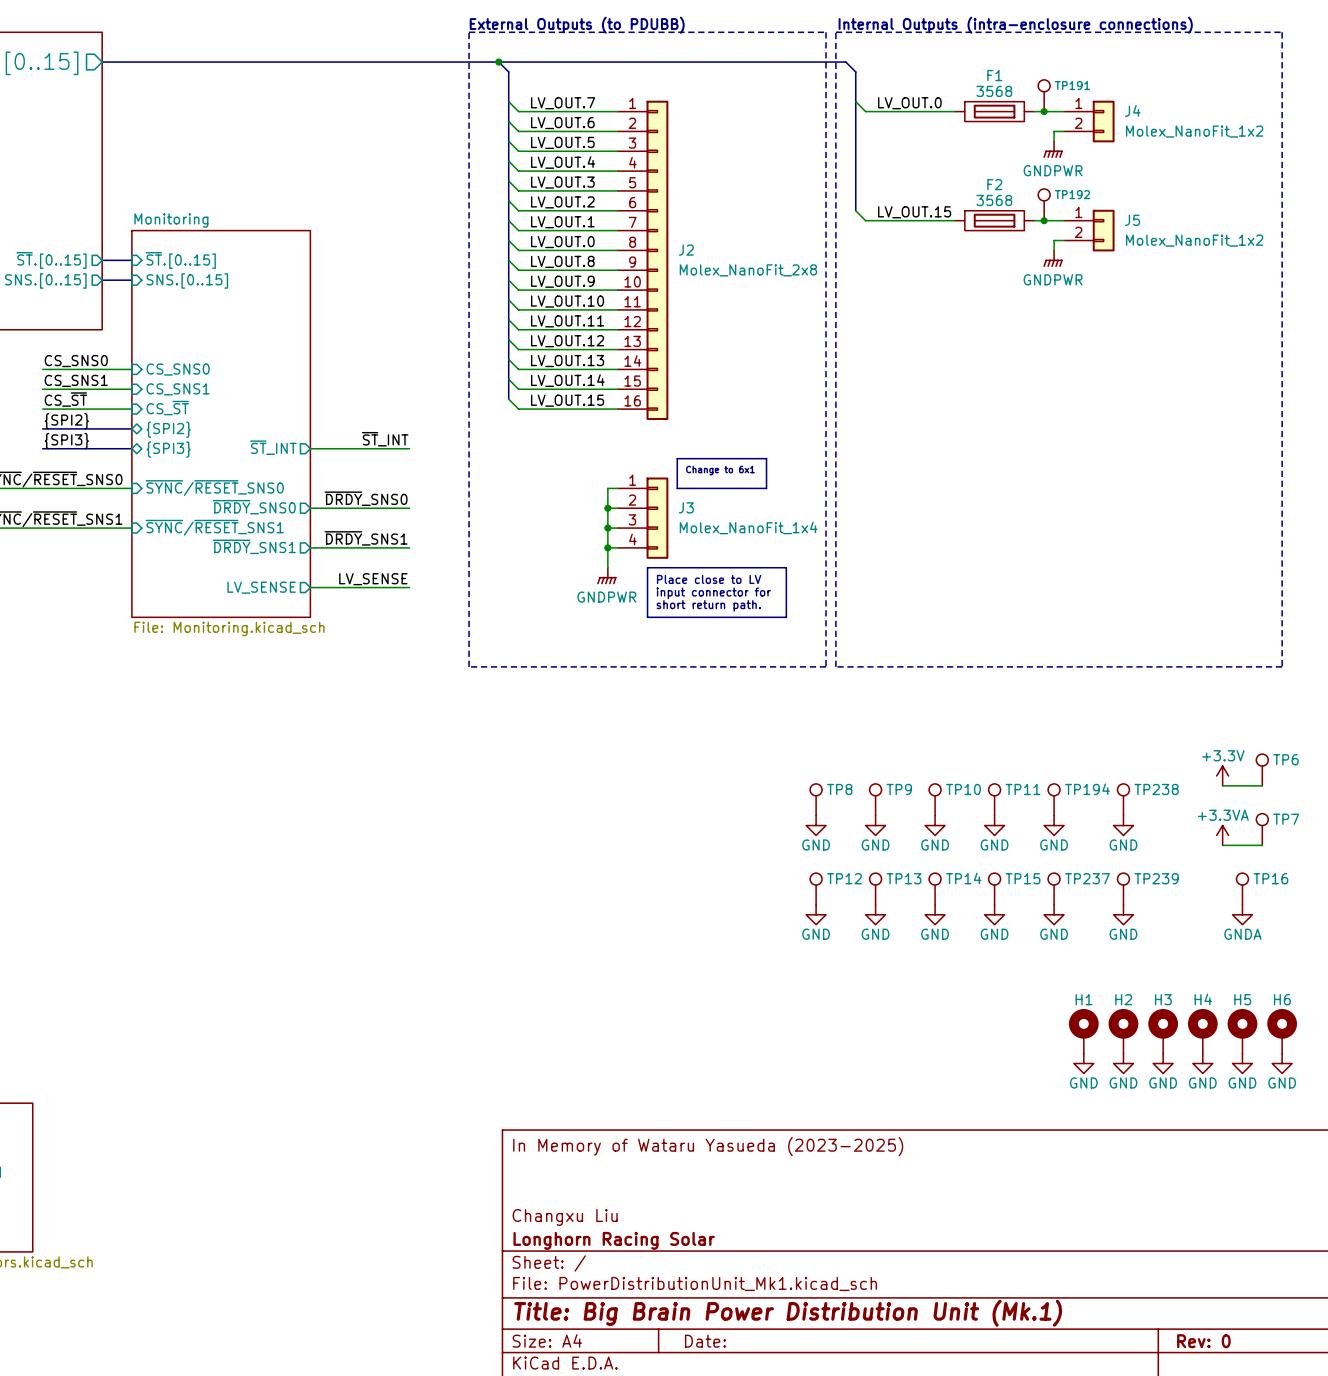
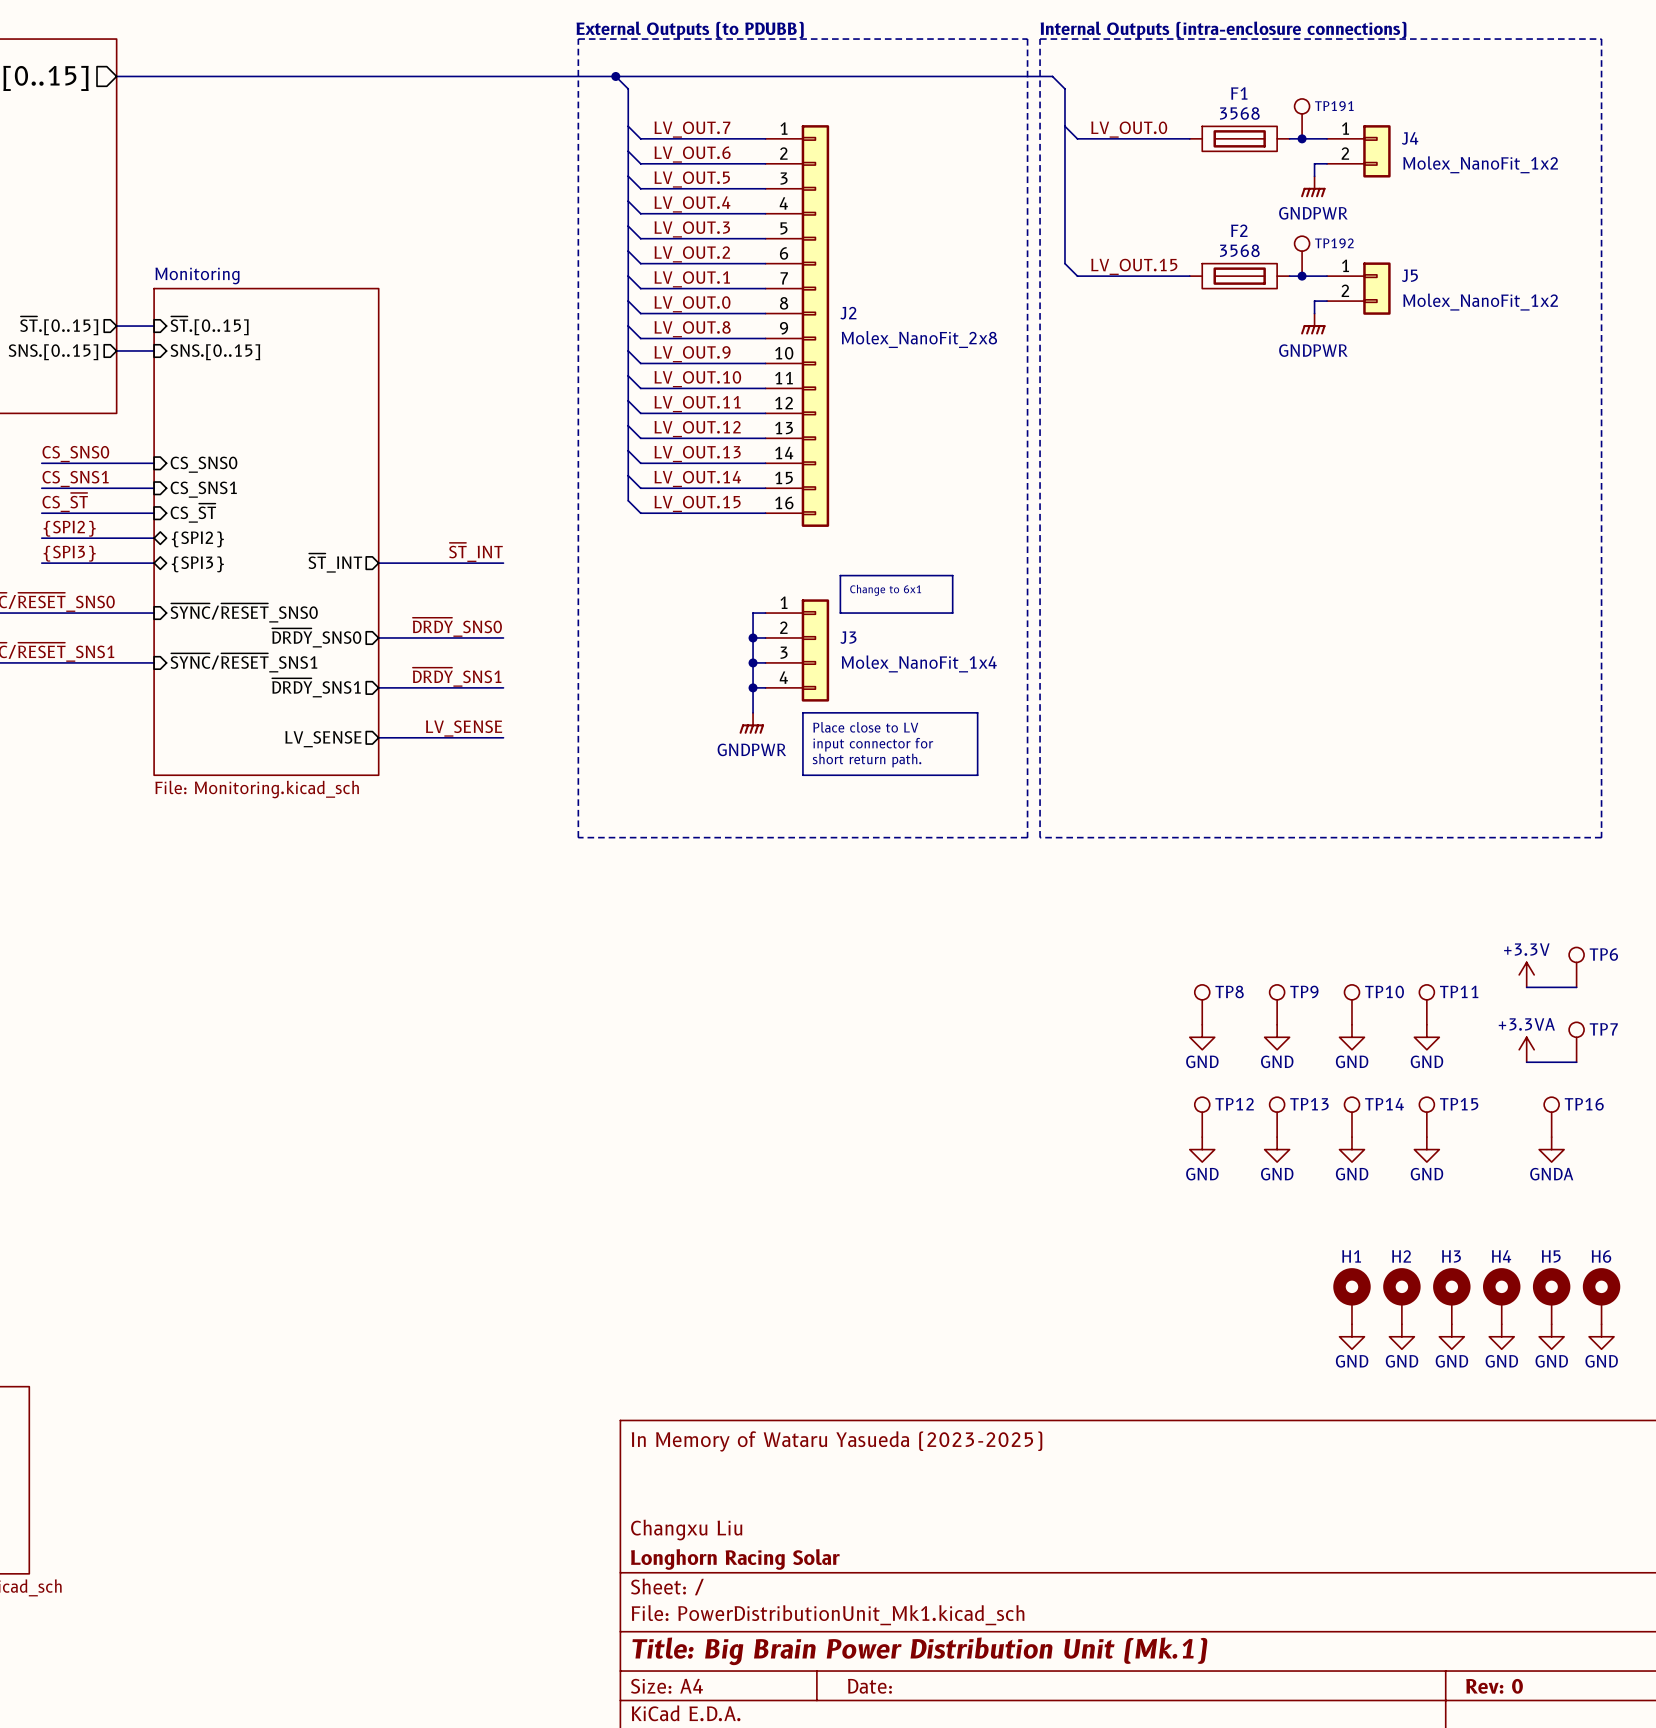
TP8 position: (816, 799) -> (1202, 1004)
TP9 position: (875, 799) -> (1277, 1004)
TP10 position: (935, 799) -> (1351, 1004)
TP11 position: (994, 799) -> (1426, 1004)
TP194: (1054, 799) -> none
TP238: (1123, 799) -> none
power symbol: GND (816, 825) -> none
power symbol: GND (875, 825) -> none
power symbol: GND (935, 825) -> none
power symbol: none -> GND (1202, 1037)
power symbol: GND (994, 825) -> none
power symbol: none -> GND (1277, 1037)
power symbol: GND (1054, 825) -> none
power symbol: none -> GND (1351, 1037)
power symbol: GND (1123, 825) -> none
power symbol: none -> GND (1426, 1037)
TP12 position: (816, 889) -> (1202, 1117)
TP13 position: (875, 889) -> (1277, 1117)
TP14 position: (935, 889) -> (1351, 1117)
TP15 position: (994, 889) -> (1426, 1117)
TP237: (1054, 889) -> none
TP239: (1123, 889) -> none
power symbol: GND (816, 914) -> none
power symbol: GND (875, 914) -> none
power symbol: GND (935, 914) -> none
power symbol: none -> GND (1202, 1149)
power symbol: GND (994, 914) -> none
power symbol: none -> GND (1277, 1149)
power symbol: GND (1054, 914) -> none
power symbol: none -> GND (1351, 1149)
power symbol: GND (1123, 914) -> none
power symbol: none -> GND (1426, 1149)

